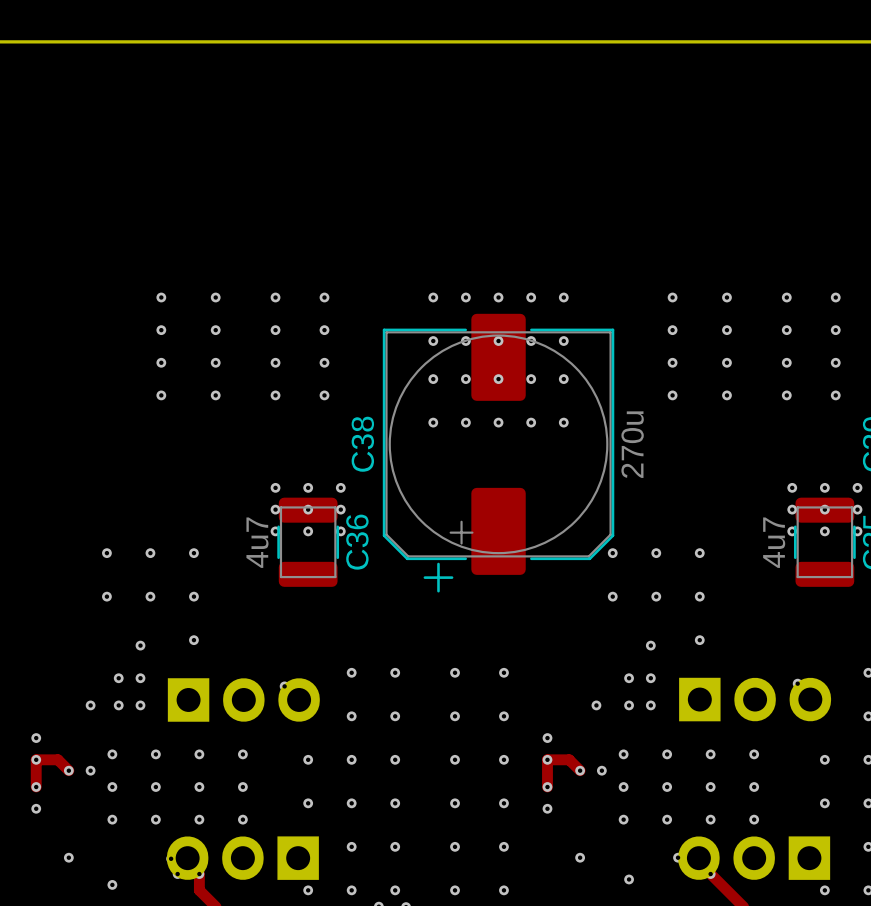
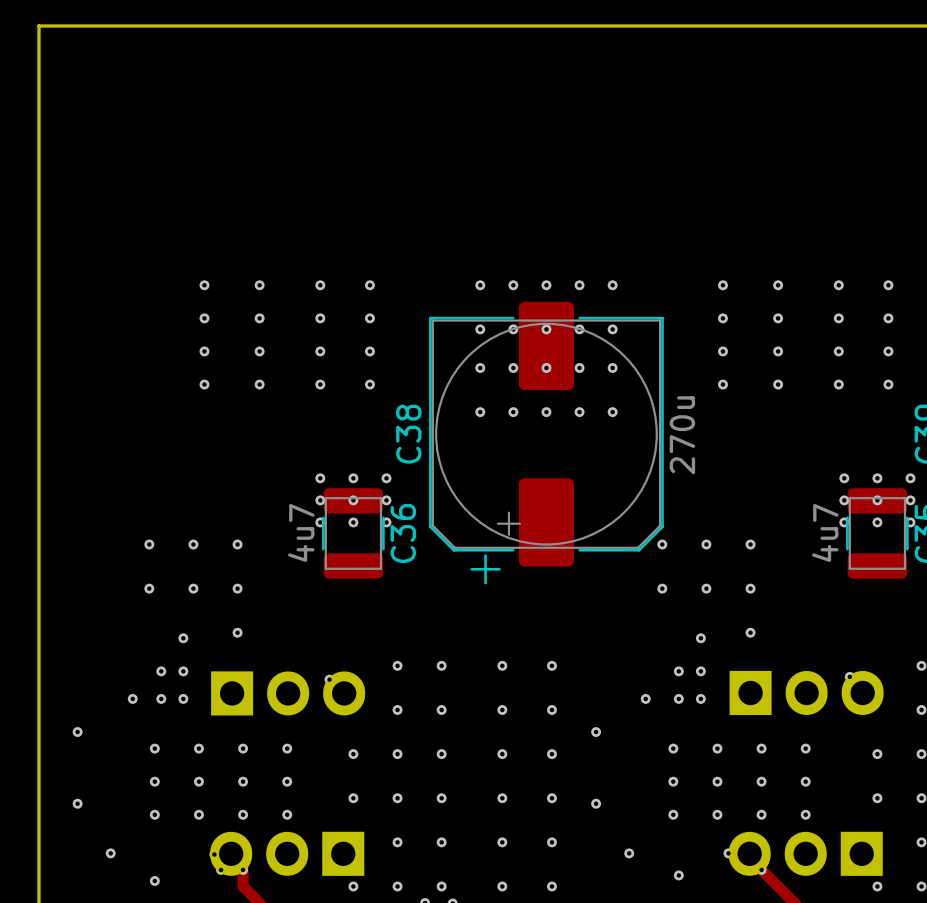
via: (36, 759) -> none
via: (547, 759) -> none
track: (68, 770) (57, 759) (36, 759) (36, 787) -> none
via: (68, 770) -> none
via: (90, 770) -> none
track: (580, 770) (569, 759) (547, 759) (547, 787) -> none
via: (580, 770) -> none
via: (601, 770) -> none
via: (36, 787) -> none
via: (547, 787) -> none

